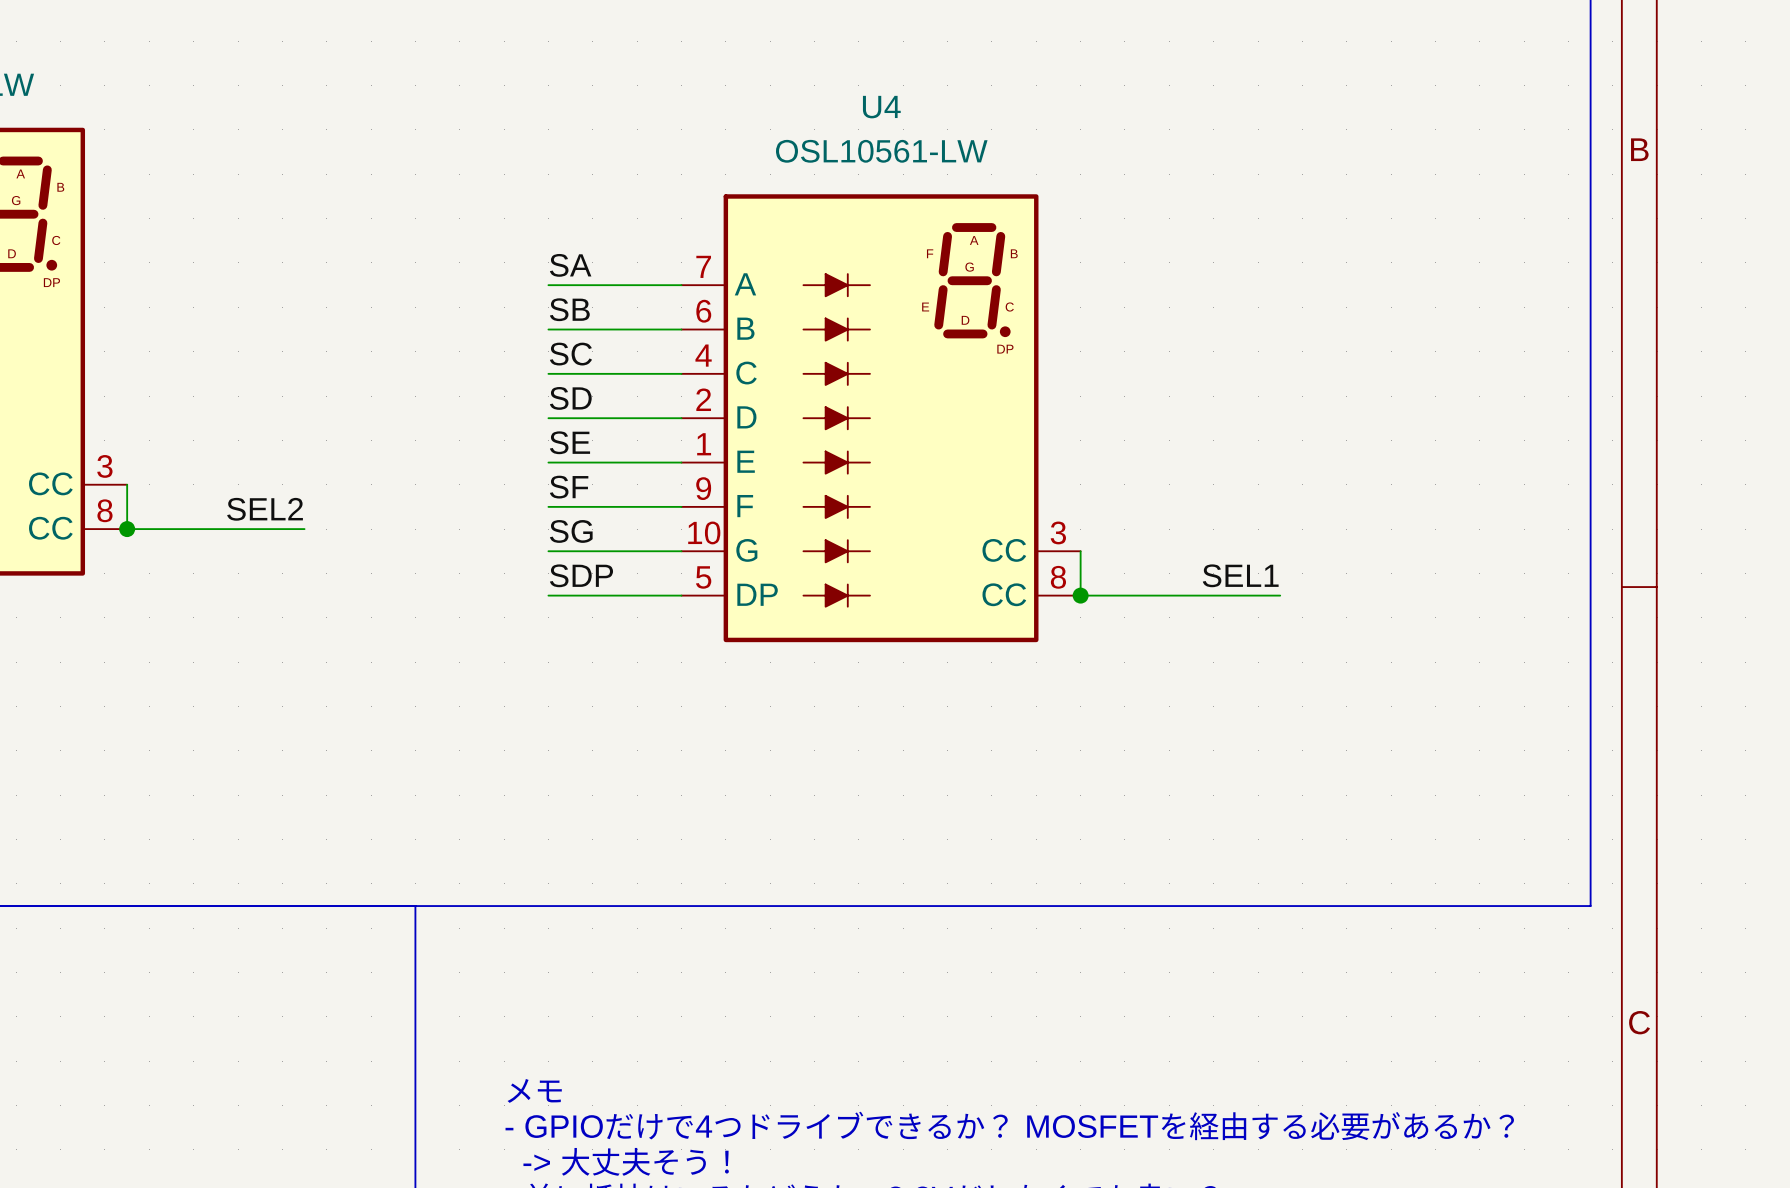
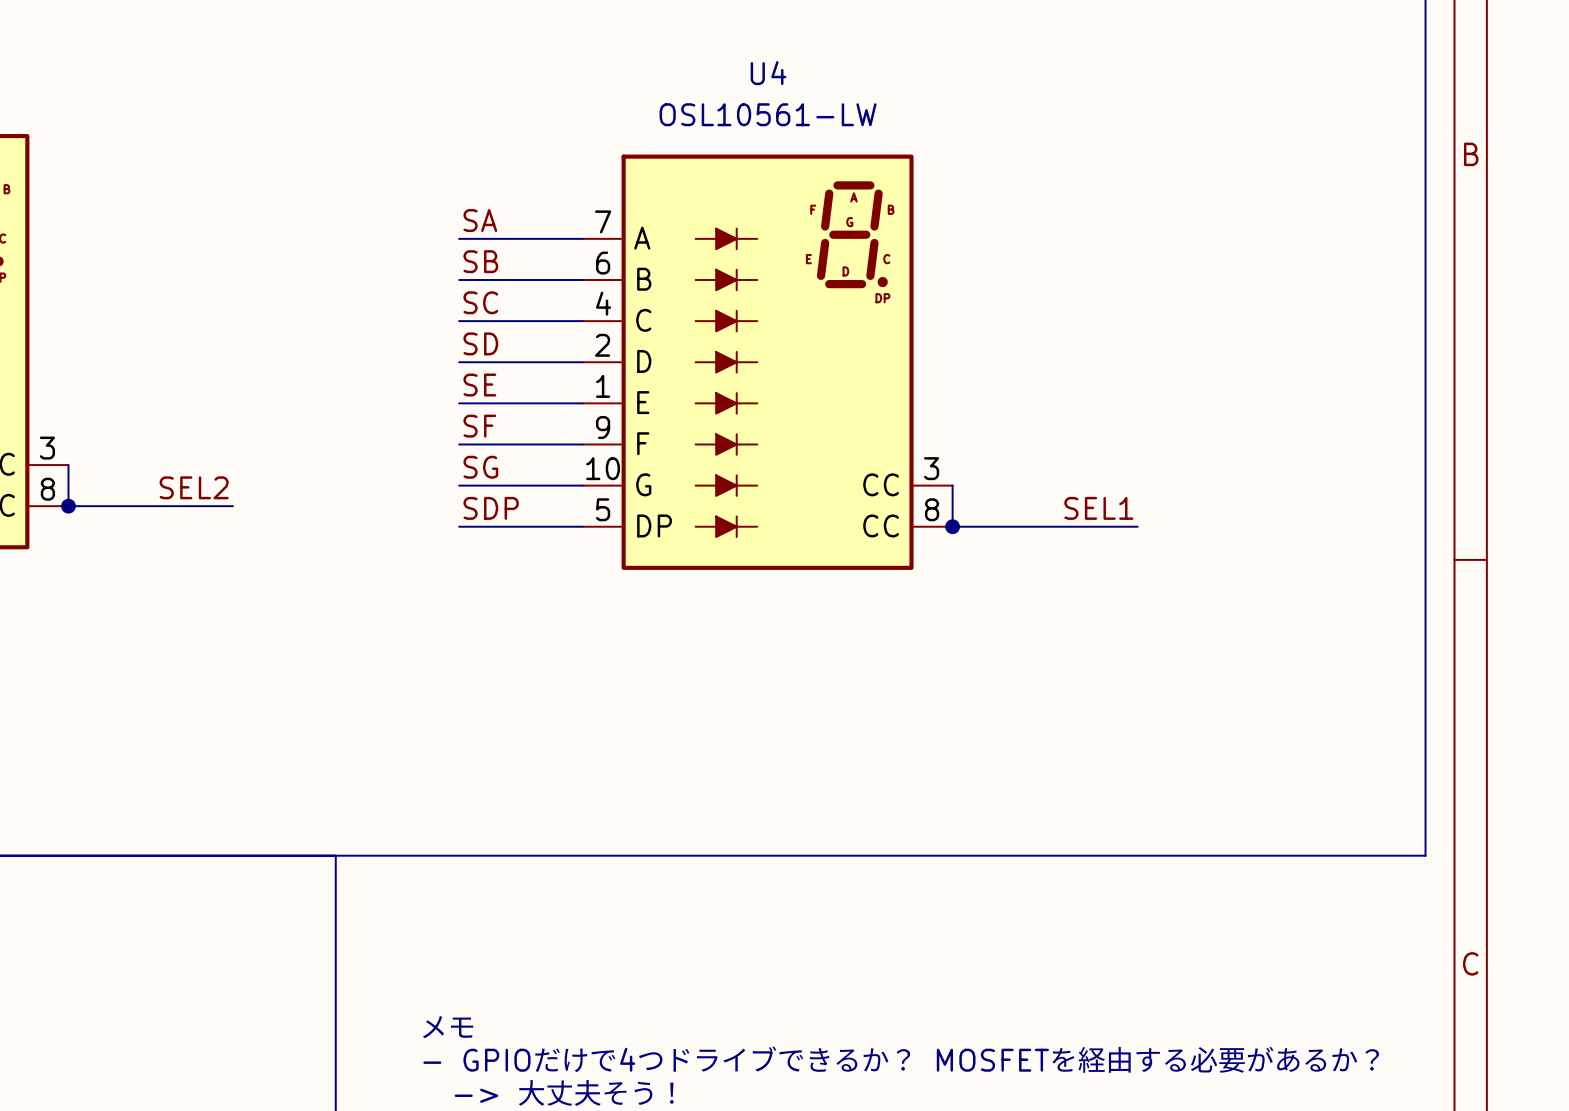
label: none -> SA (480, 220)
label: SA (570, 265) -> SB (480, 261)
label: SB (569, 309) -> SC (480, 302)
label: SC (570, 354) -> SD (480, 343)
label: SD (570, 398) -> SE (479, 385)
U4 position: (881, 418) -> (767, 362)
label: SE (569, 442) -> SF (479, 426)
label: SF (569, 487) -> SG (480, 467)
label: SG (571, 531) -> SDP (491, 508)
wire: (1080, 551) (1080, 595) (1280, 595) -> (952, 485) (952, 526) (1137, 526)
label: SDP (581, 575) -> none
label position: SEL1 (1240, 575) -> SEL1 (1098, 508)
wire: (548, 595) (681, 595) -> (459, 238) (582, 238)
junction position: (1080, 595) -> (952, 526)

